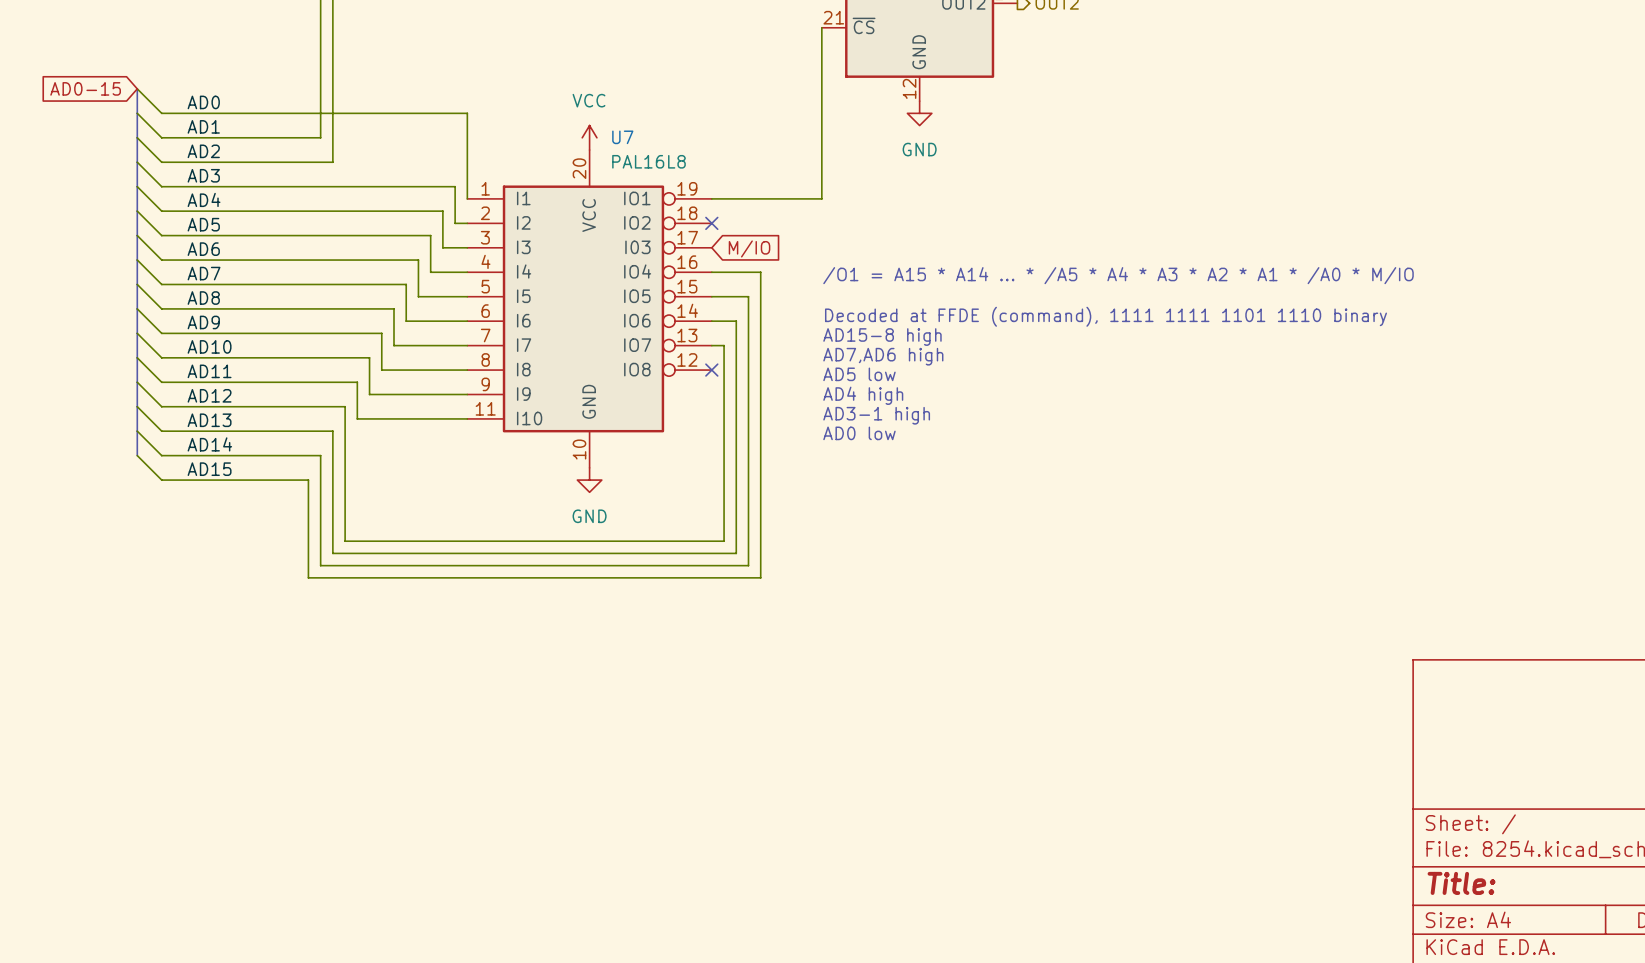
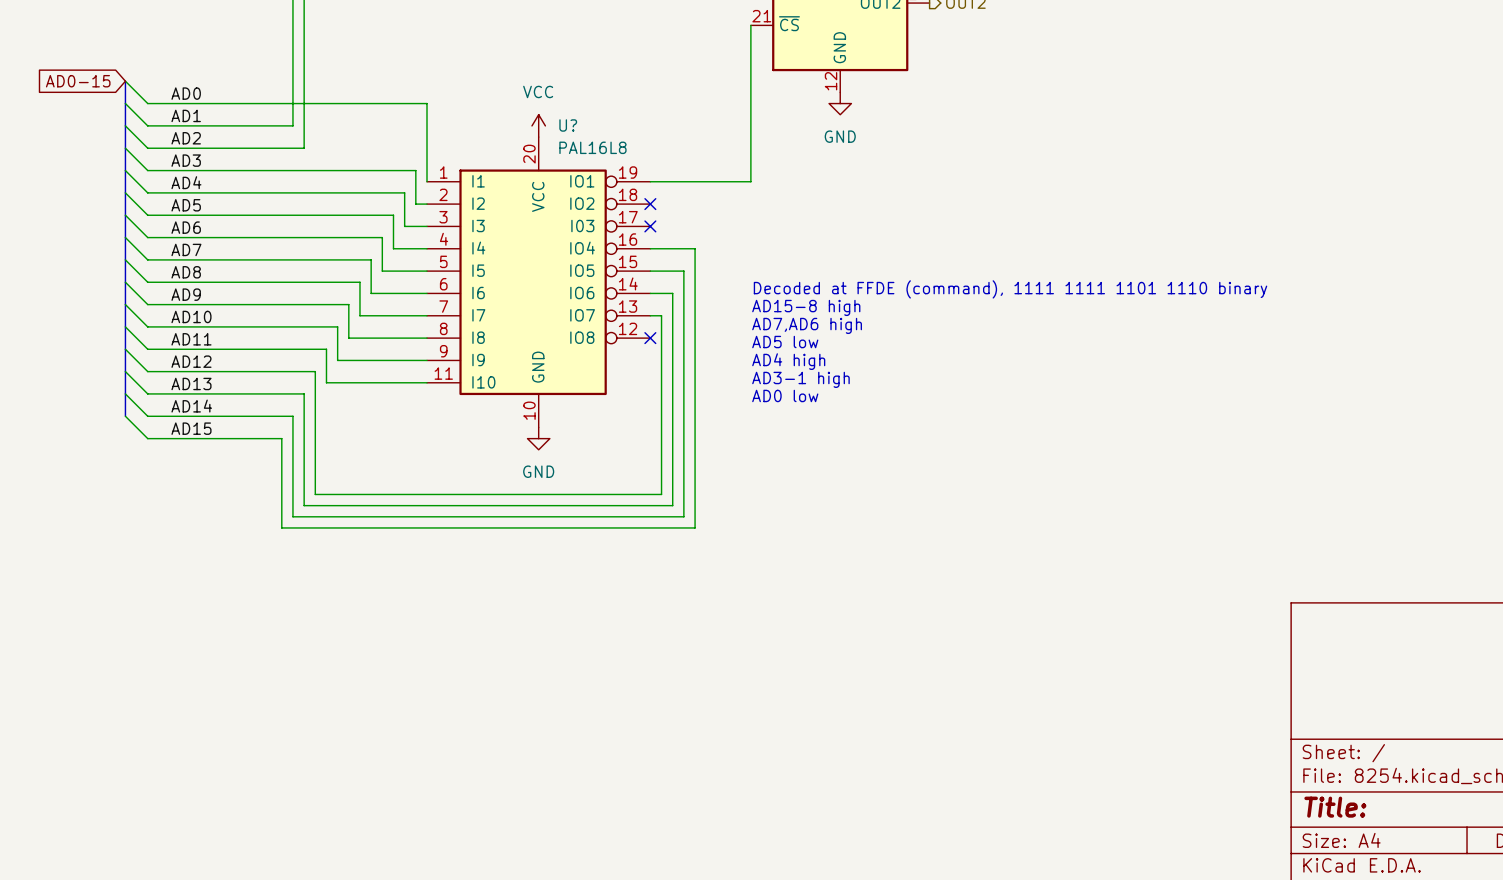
U7 name: U7 (622, 137) -> U? (568, 125)
no-connect mark: none -> (650, 226)
global label: M/IO (749, 248) -> none
text: /O1 = A15 * A14 ... * /A5 * A4 * A3 * A2 * A1 * /A0 * M/IO (1118, 275) -> none

